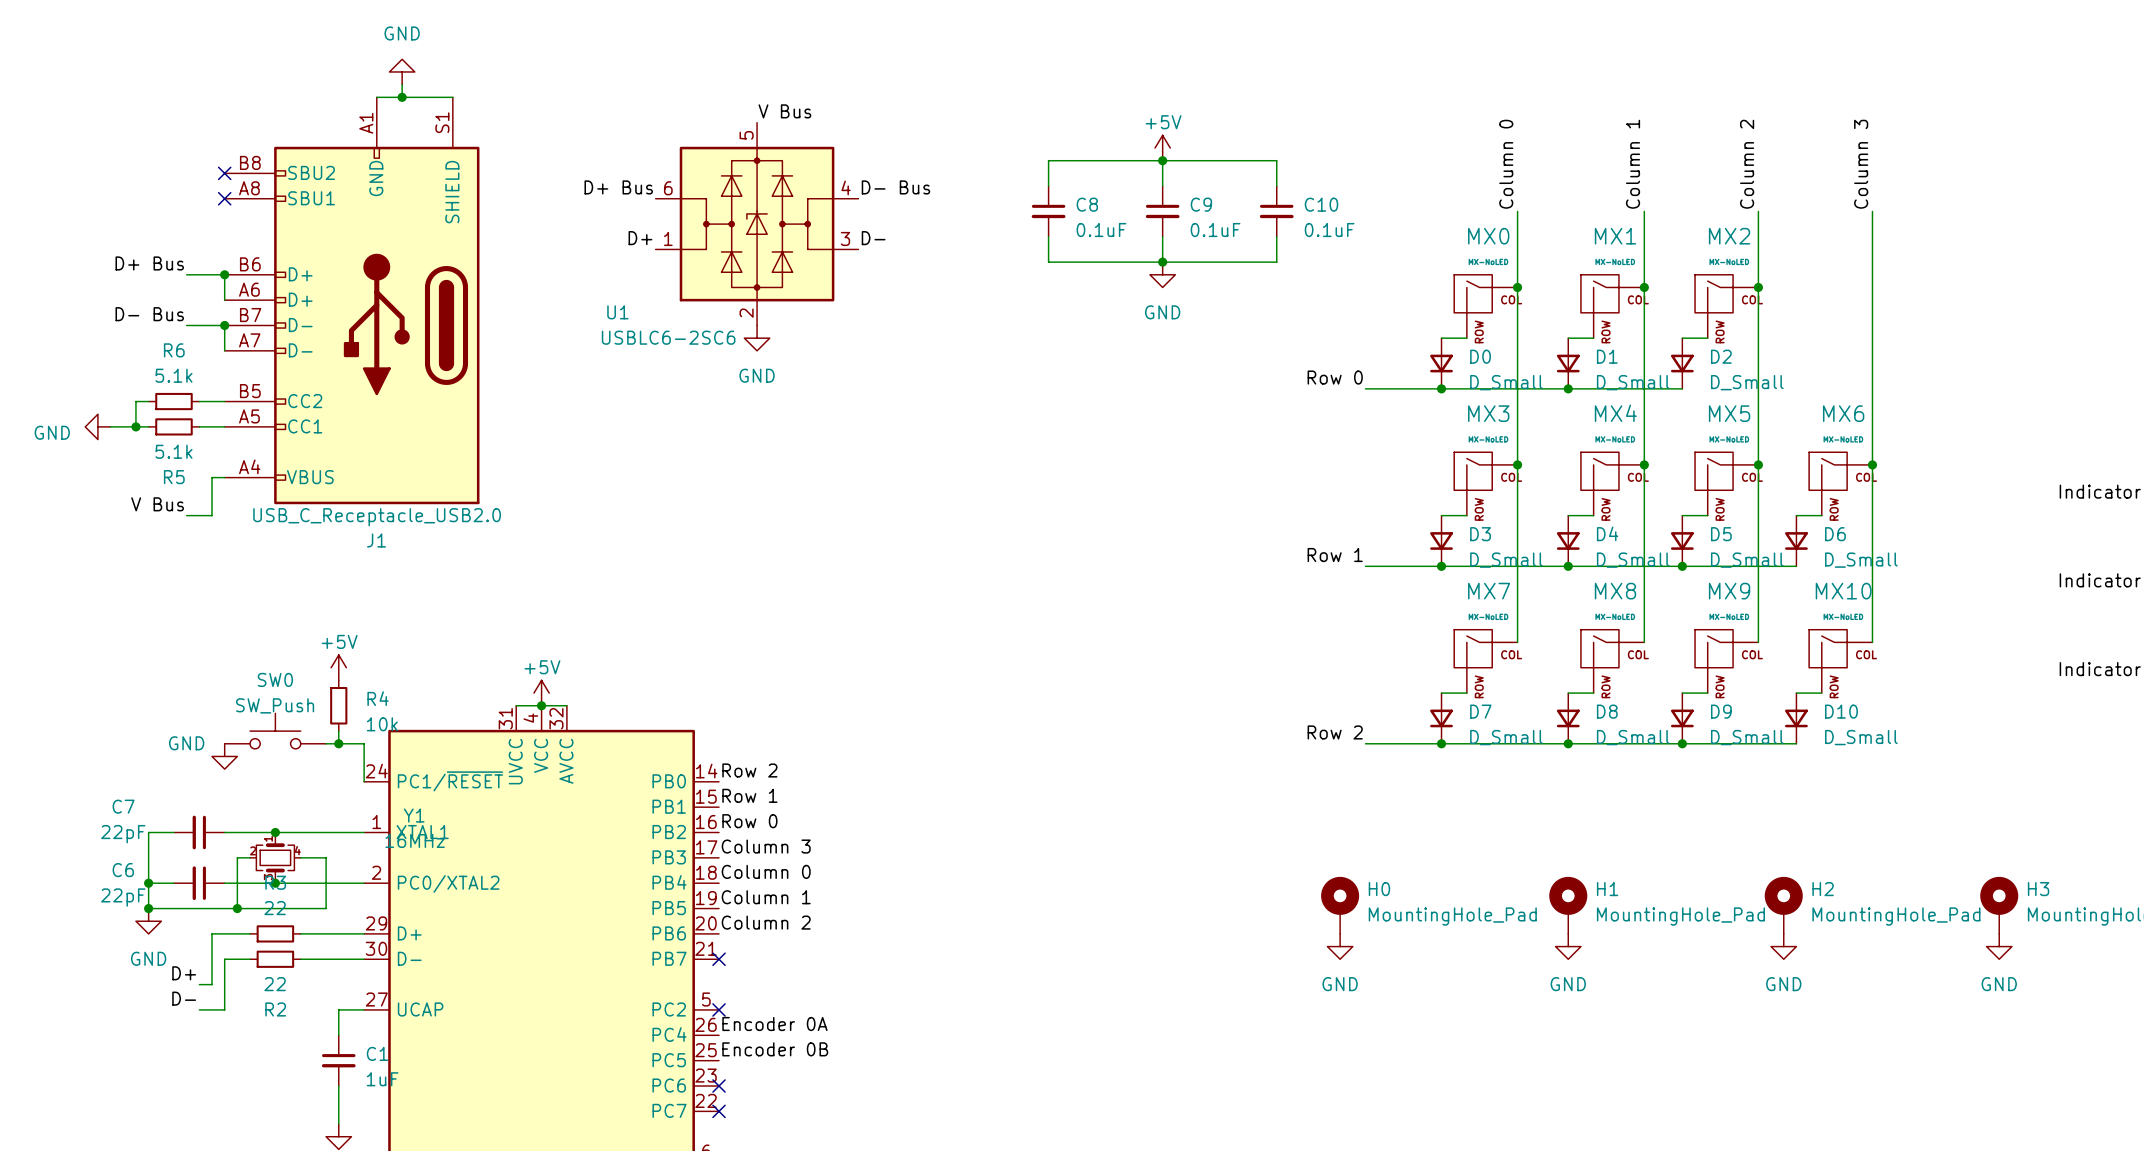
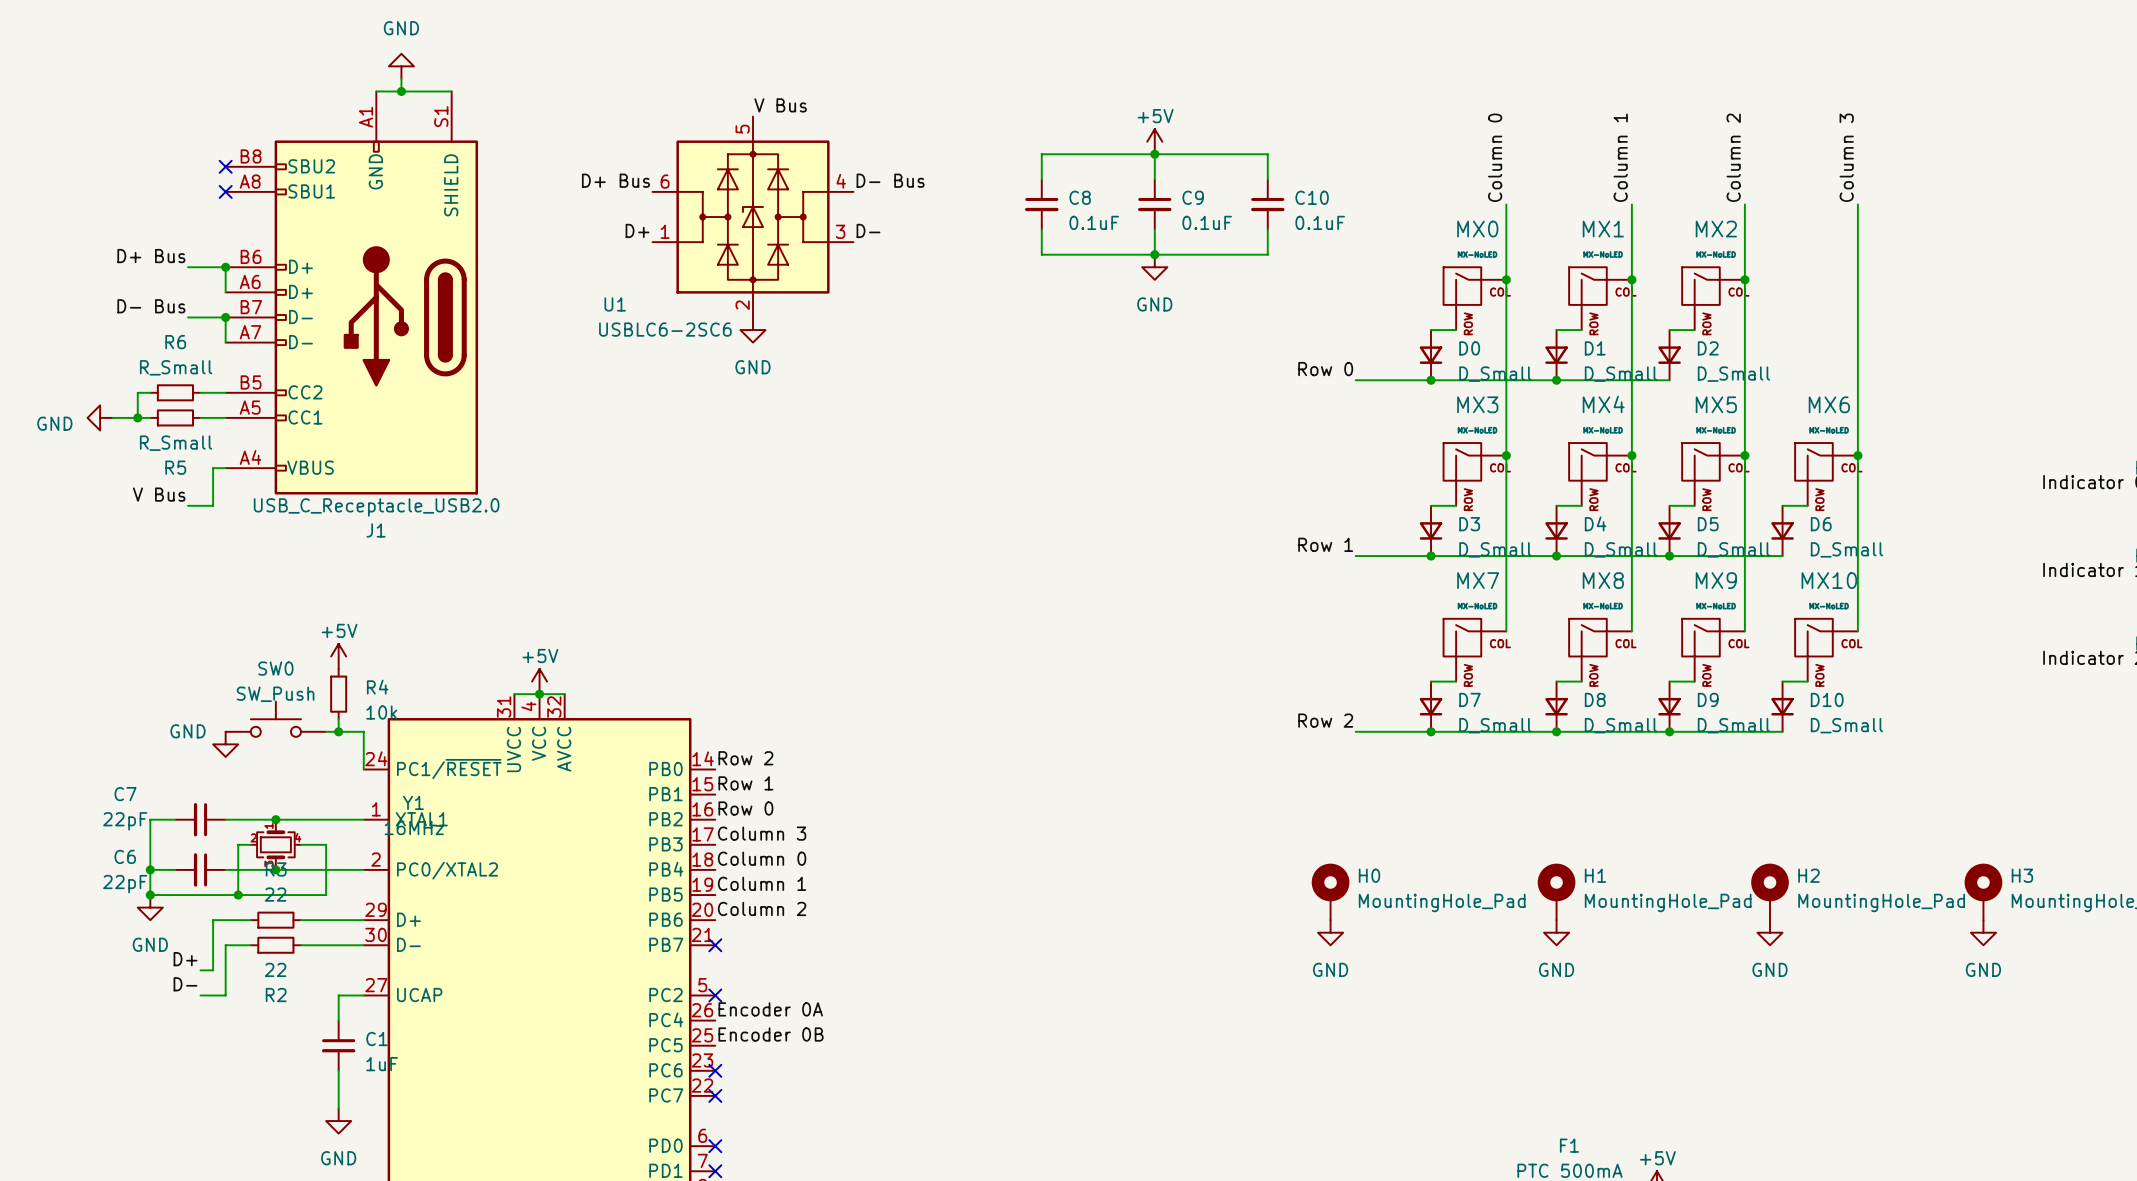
R6 value: 5.1k (173, 375) -> R_Small (176, 367)
R5 value: 5.1k (173, 451) -> R_Small (176, 443)

